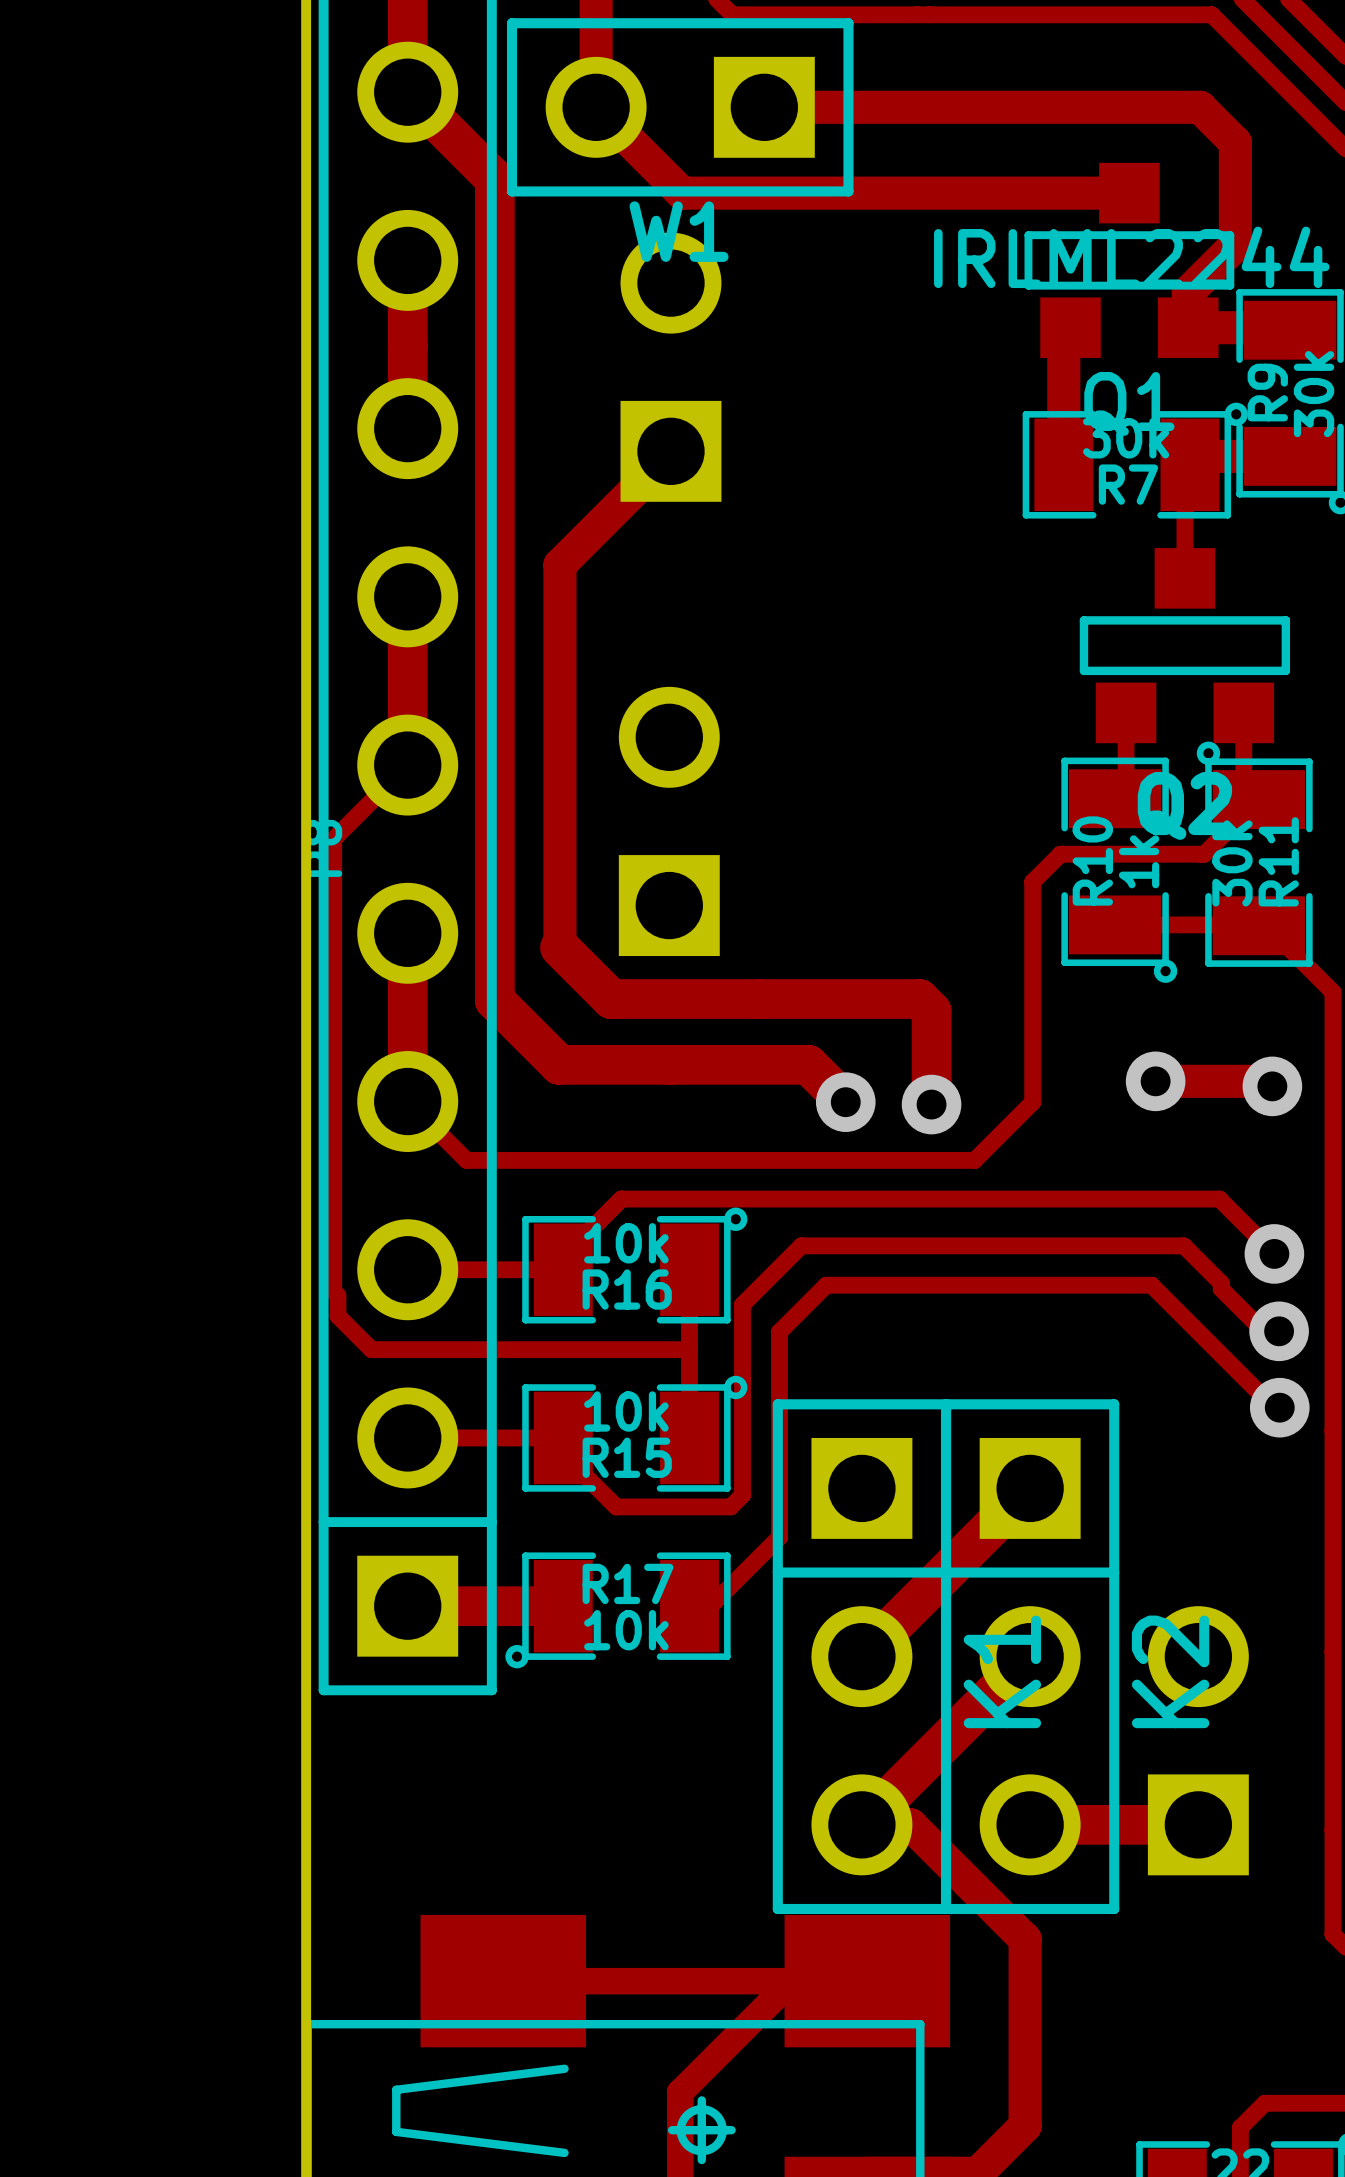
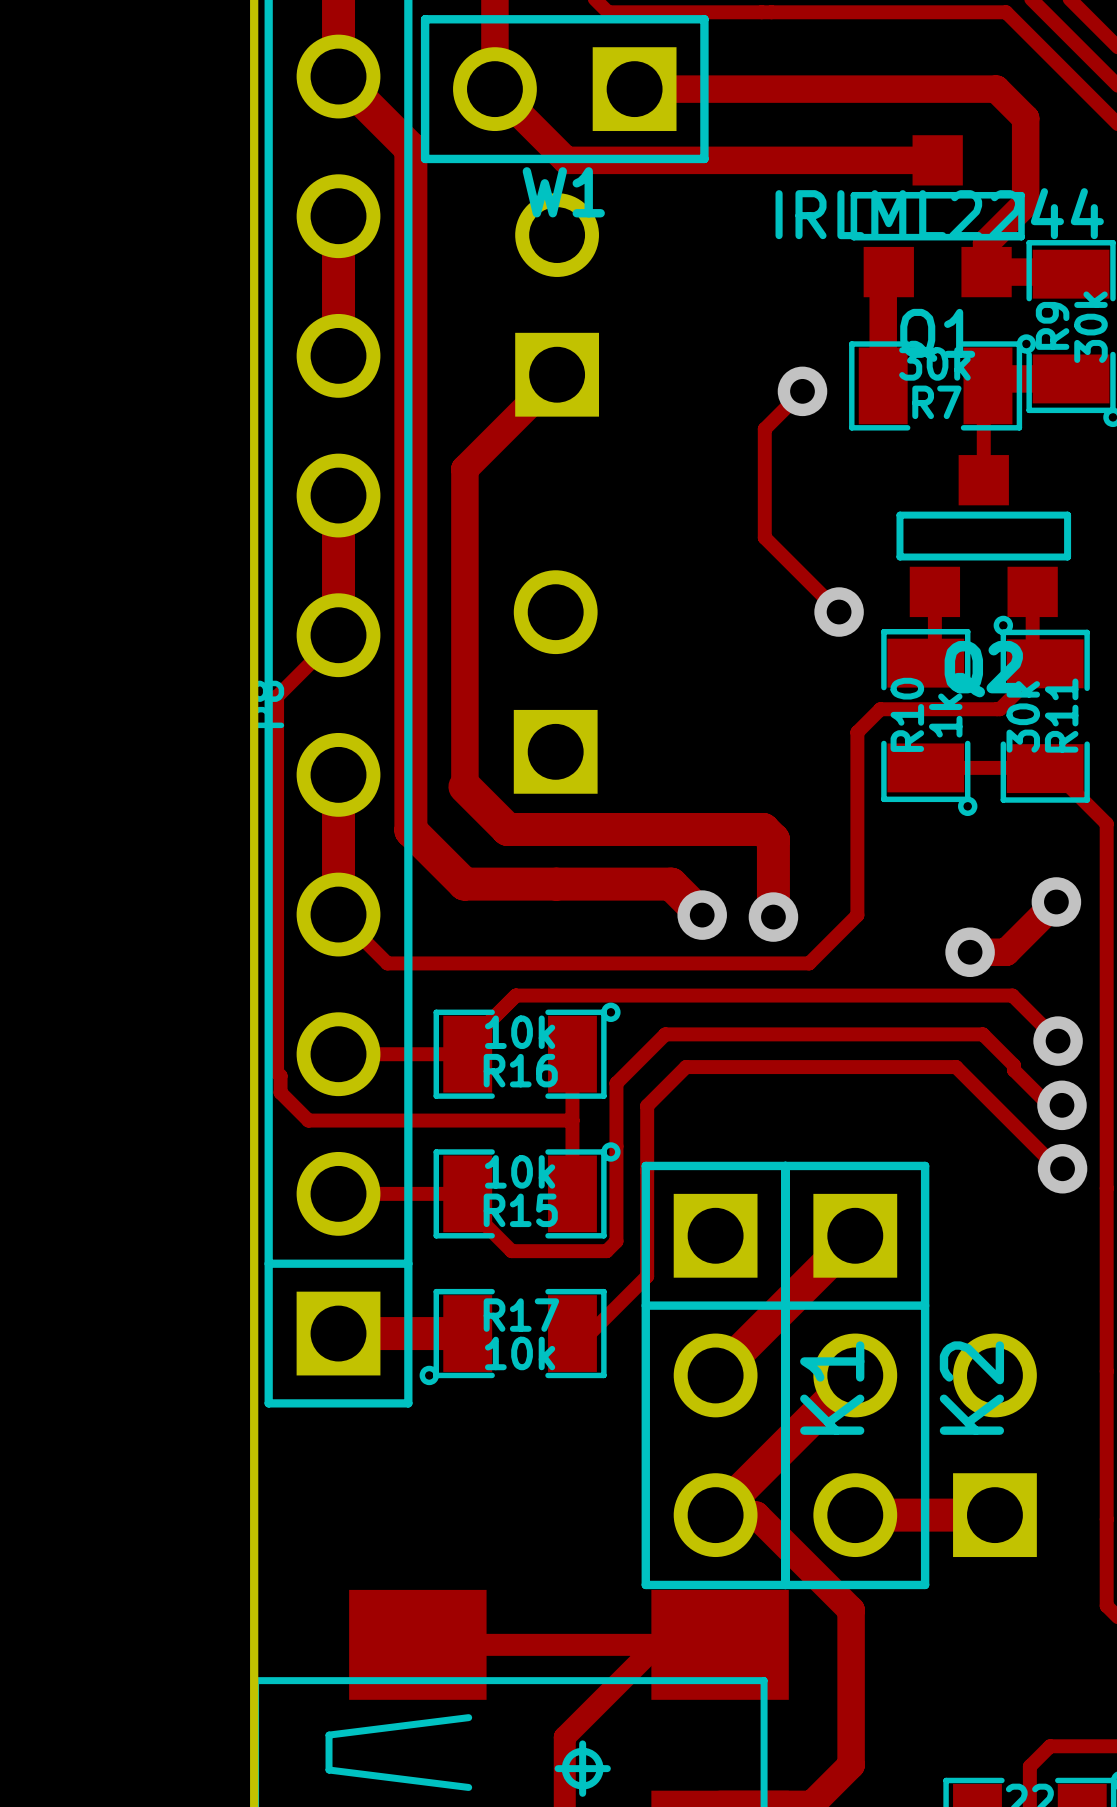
track: none -> (802, 391) (764, 429) (764, 537) (839, 612)
via: none -> (802, 391)
via: none -> (839, 612)
track: (1155, 1081) (1267, 1081) (1272, 1086) -> (970, 952) (1006, 952) (1056, 901)
via position: (1155, 1081) -> (970, 952)

